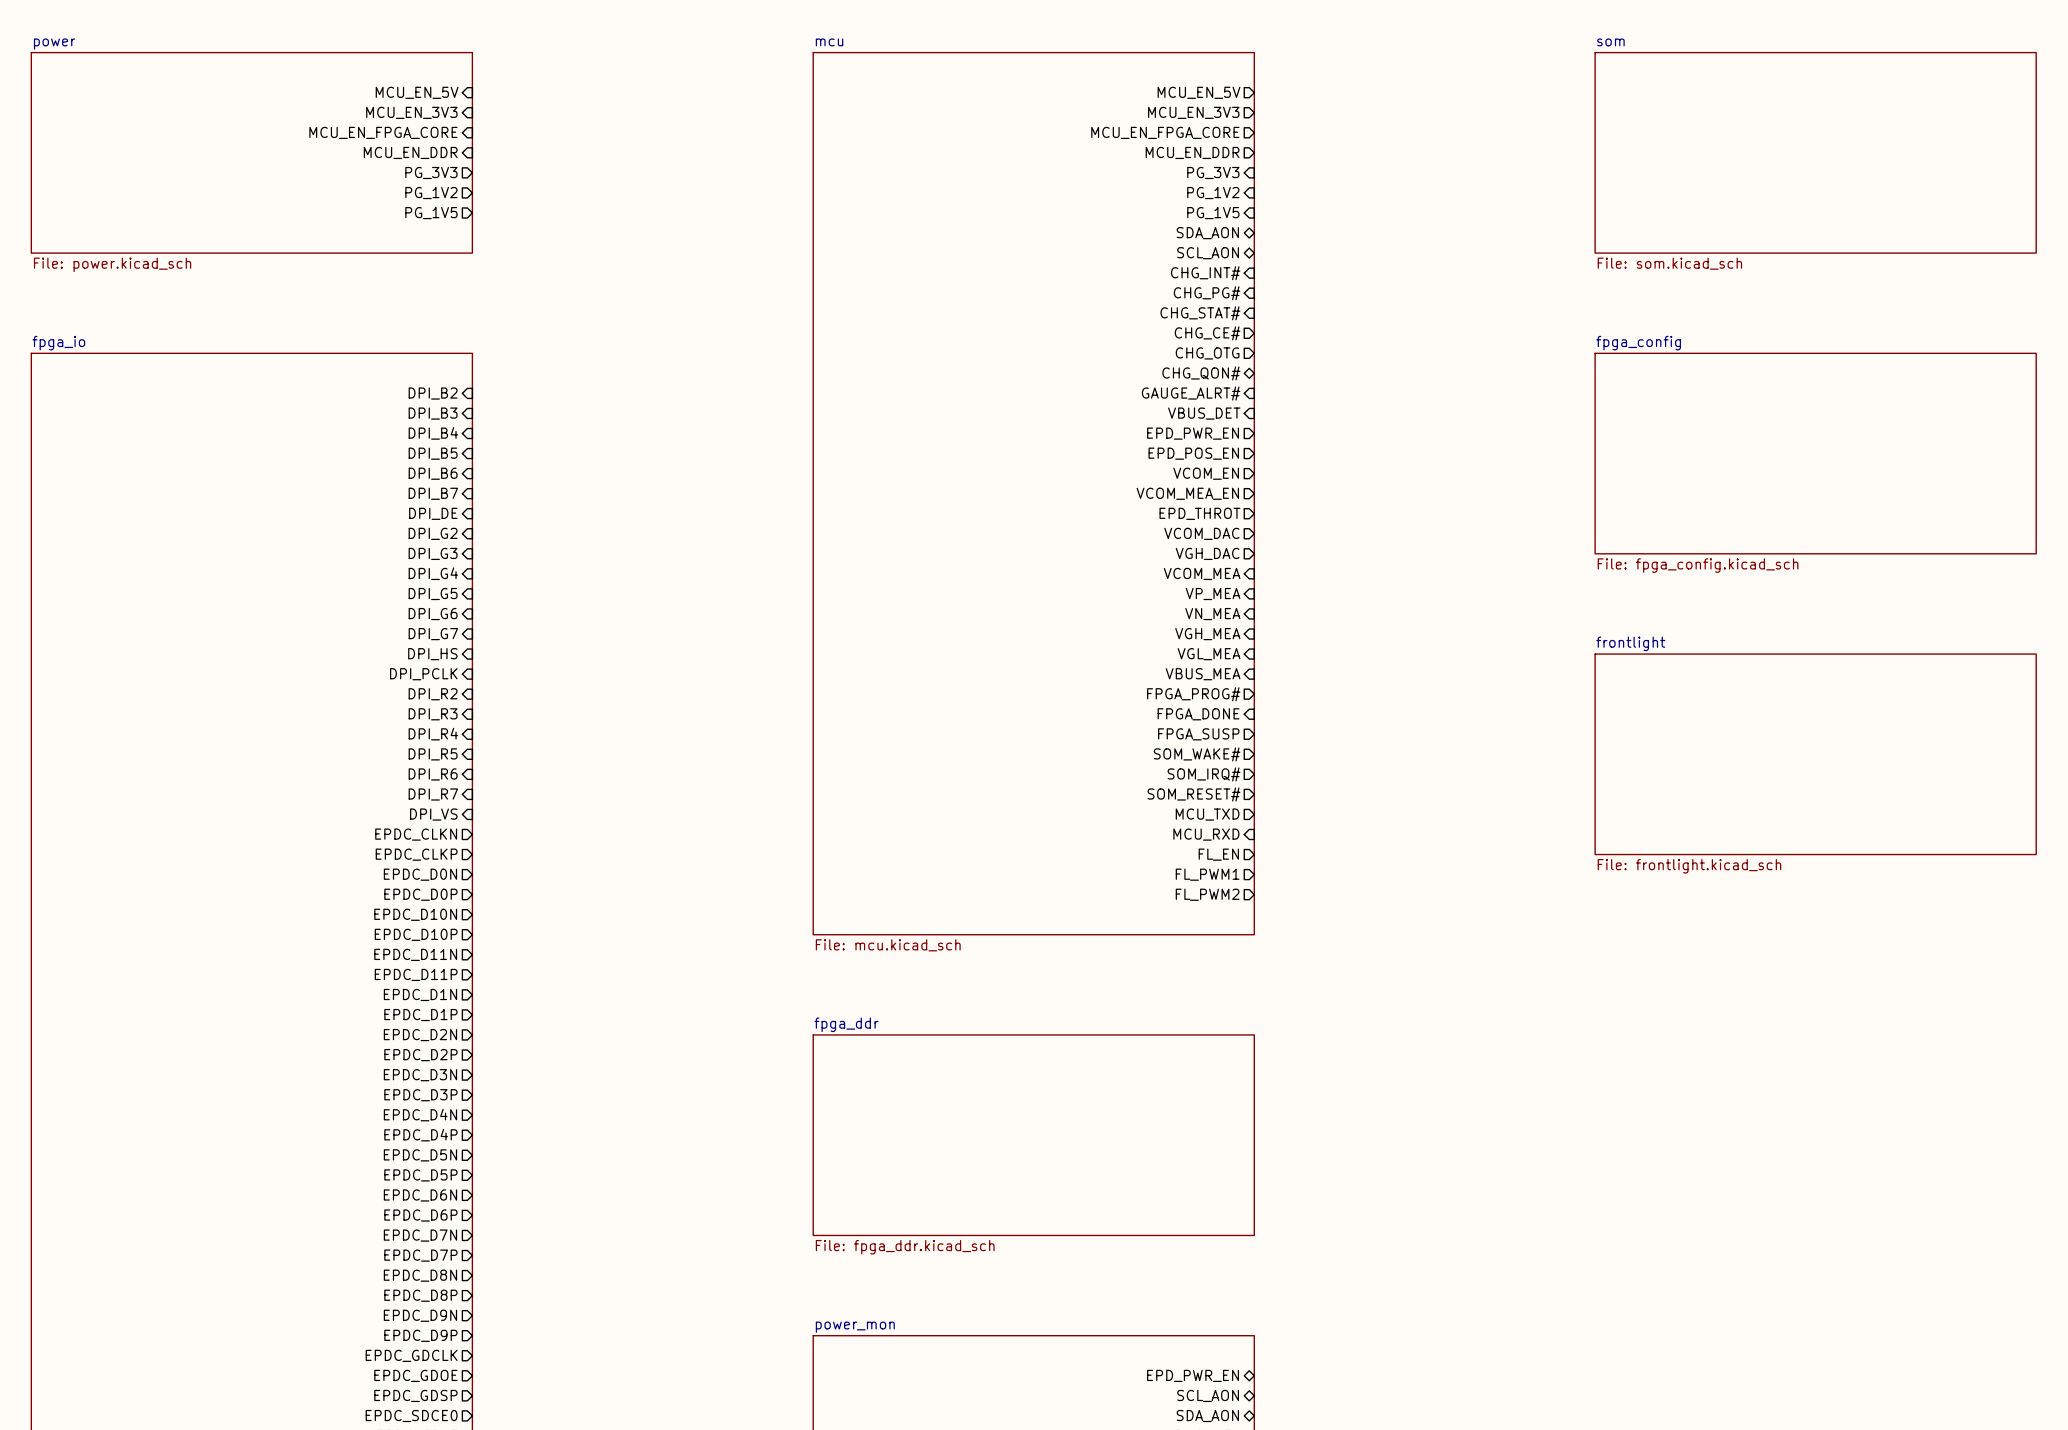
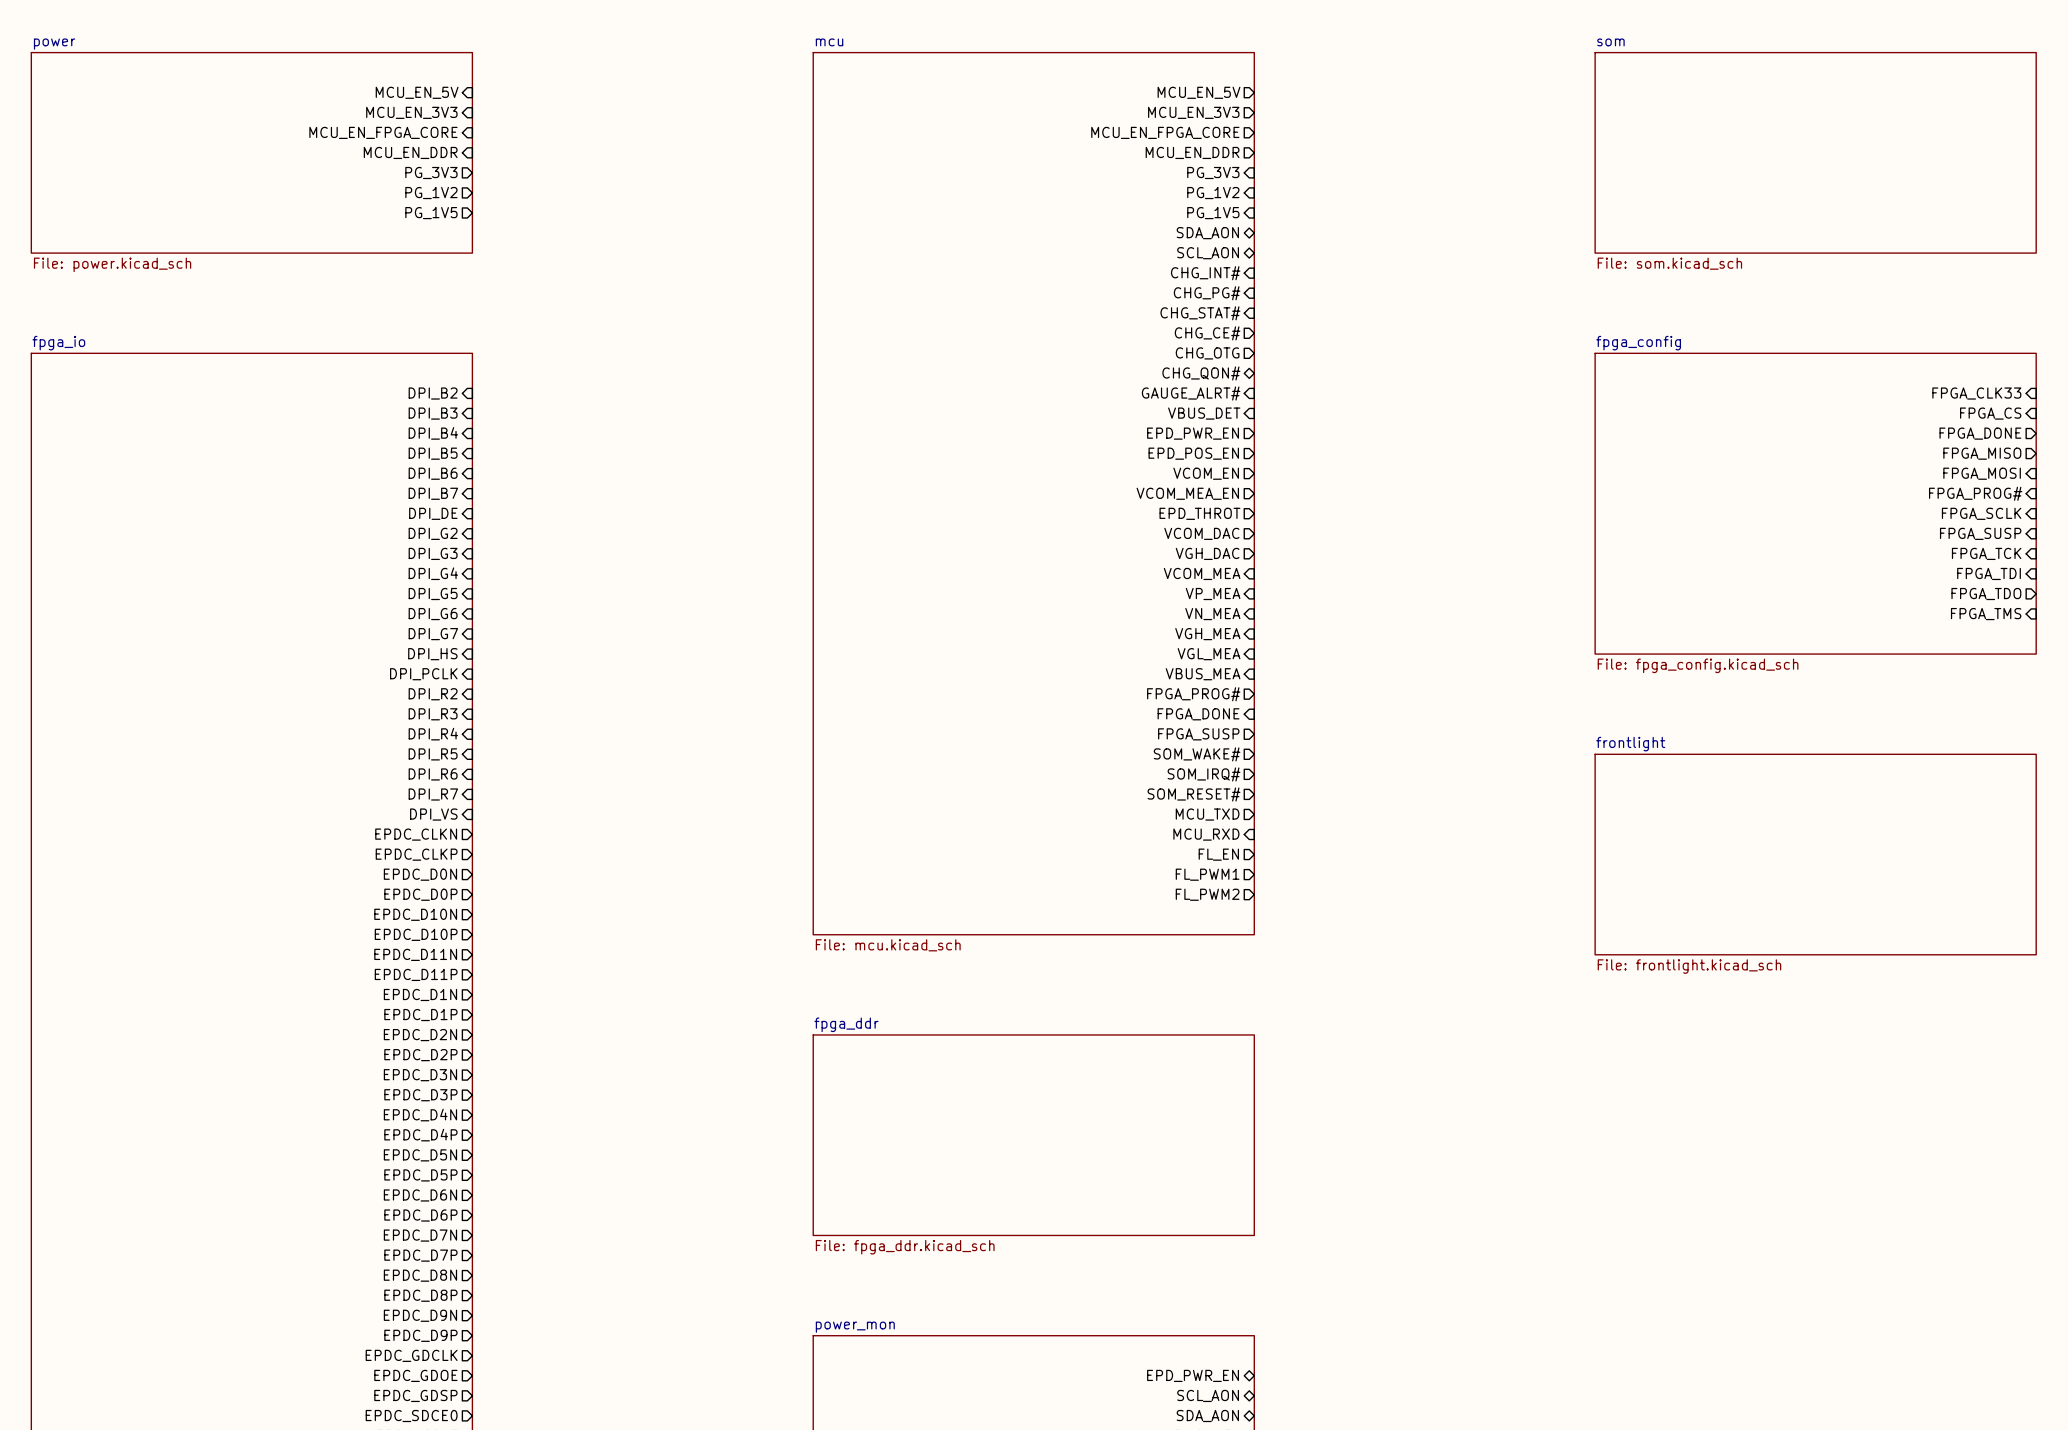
sheet pin: none -> FPGA_CLK33 (1976, 393)
sheet pin: none -> FPGA_CS (1990, 413)
sheet pin: none -> FPGA_DONE (1980, 433)
sheet fpga_config: File: fpga_config.kicad_sch (1815, 453) -> none
sheet pin: none -> FPGA_MISO (1982, 453)
sheet pin: none -> FPGA_MOSI (1982, 473)
sheet pin: none -> FPGA_PROG# (1975, 493)
sheet fpga_config: none -> File: fpga_config.kicad_sch (1815, 503)
sheet pin: none -> FPGA_SCLK (1981, 513)
sheet pin: none -> FPGA_SUSP (1980, 533)
sheet pin: none -> FPGA_TCK (1986, 553)
sheet pin: none -> FPGA_TDI (1989, 573)
sheet pin: none -> FPGA_TDO (1986, 594)
sheet pin: none -> FPGA_TMS (1986, 614)
sheet frontlight position: (1815, 754) -> (1815, 854)

